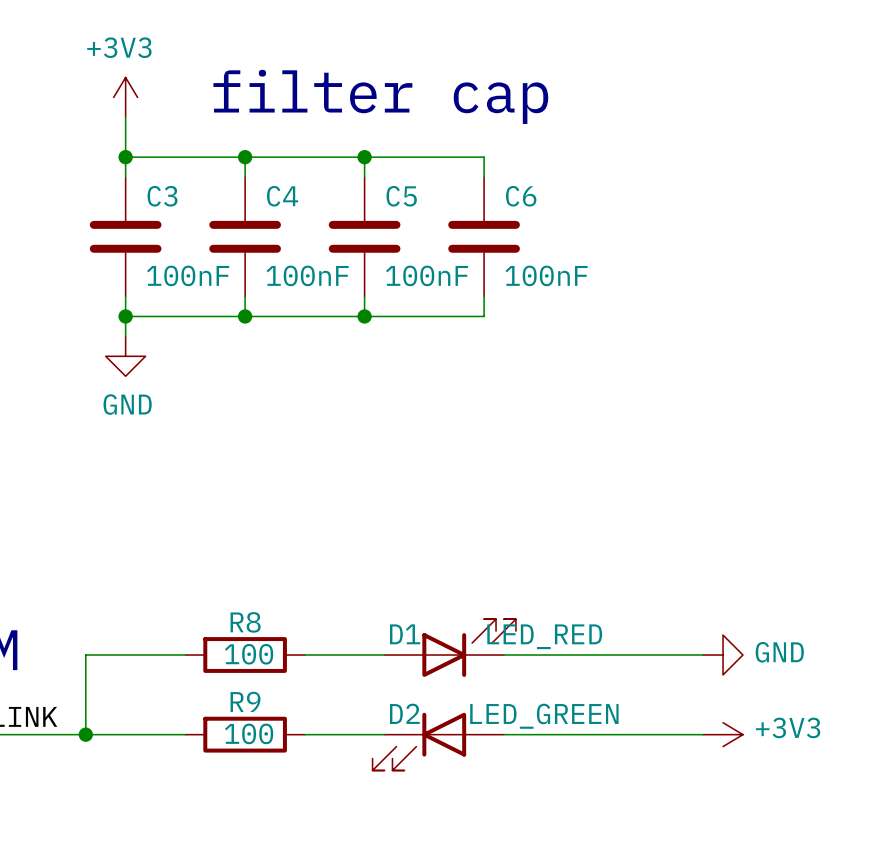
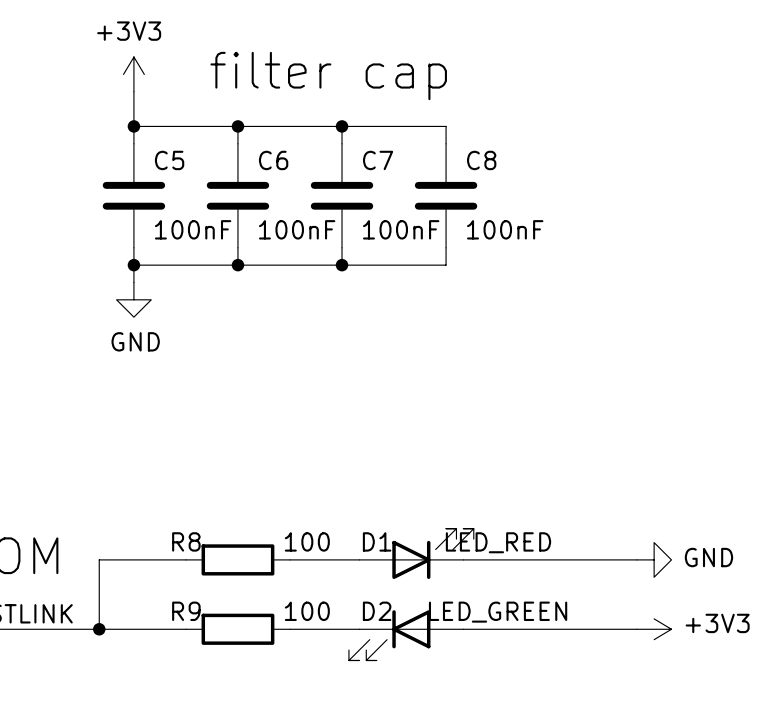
C3 name: C3 (162, 196) -> C5 (169, 160)
C4 name: C4 (282, 196) -> C6 (273, 160)
C5 name: C5 (401, 196) -> C7 (378, 160)
C6 name: C6 (521, 196) -> C8 (481, 160)
R8 name position: R8 (245, 622) -> R8 (186, 541)
R8 value position: 100 (249, 654) -> 100 (307, 541)
R9 name position: R9 (245, 701) -> R9 (186, 611)
R9 value position: 100 (249, 733) -> 100 (307, 611)

